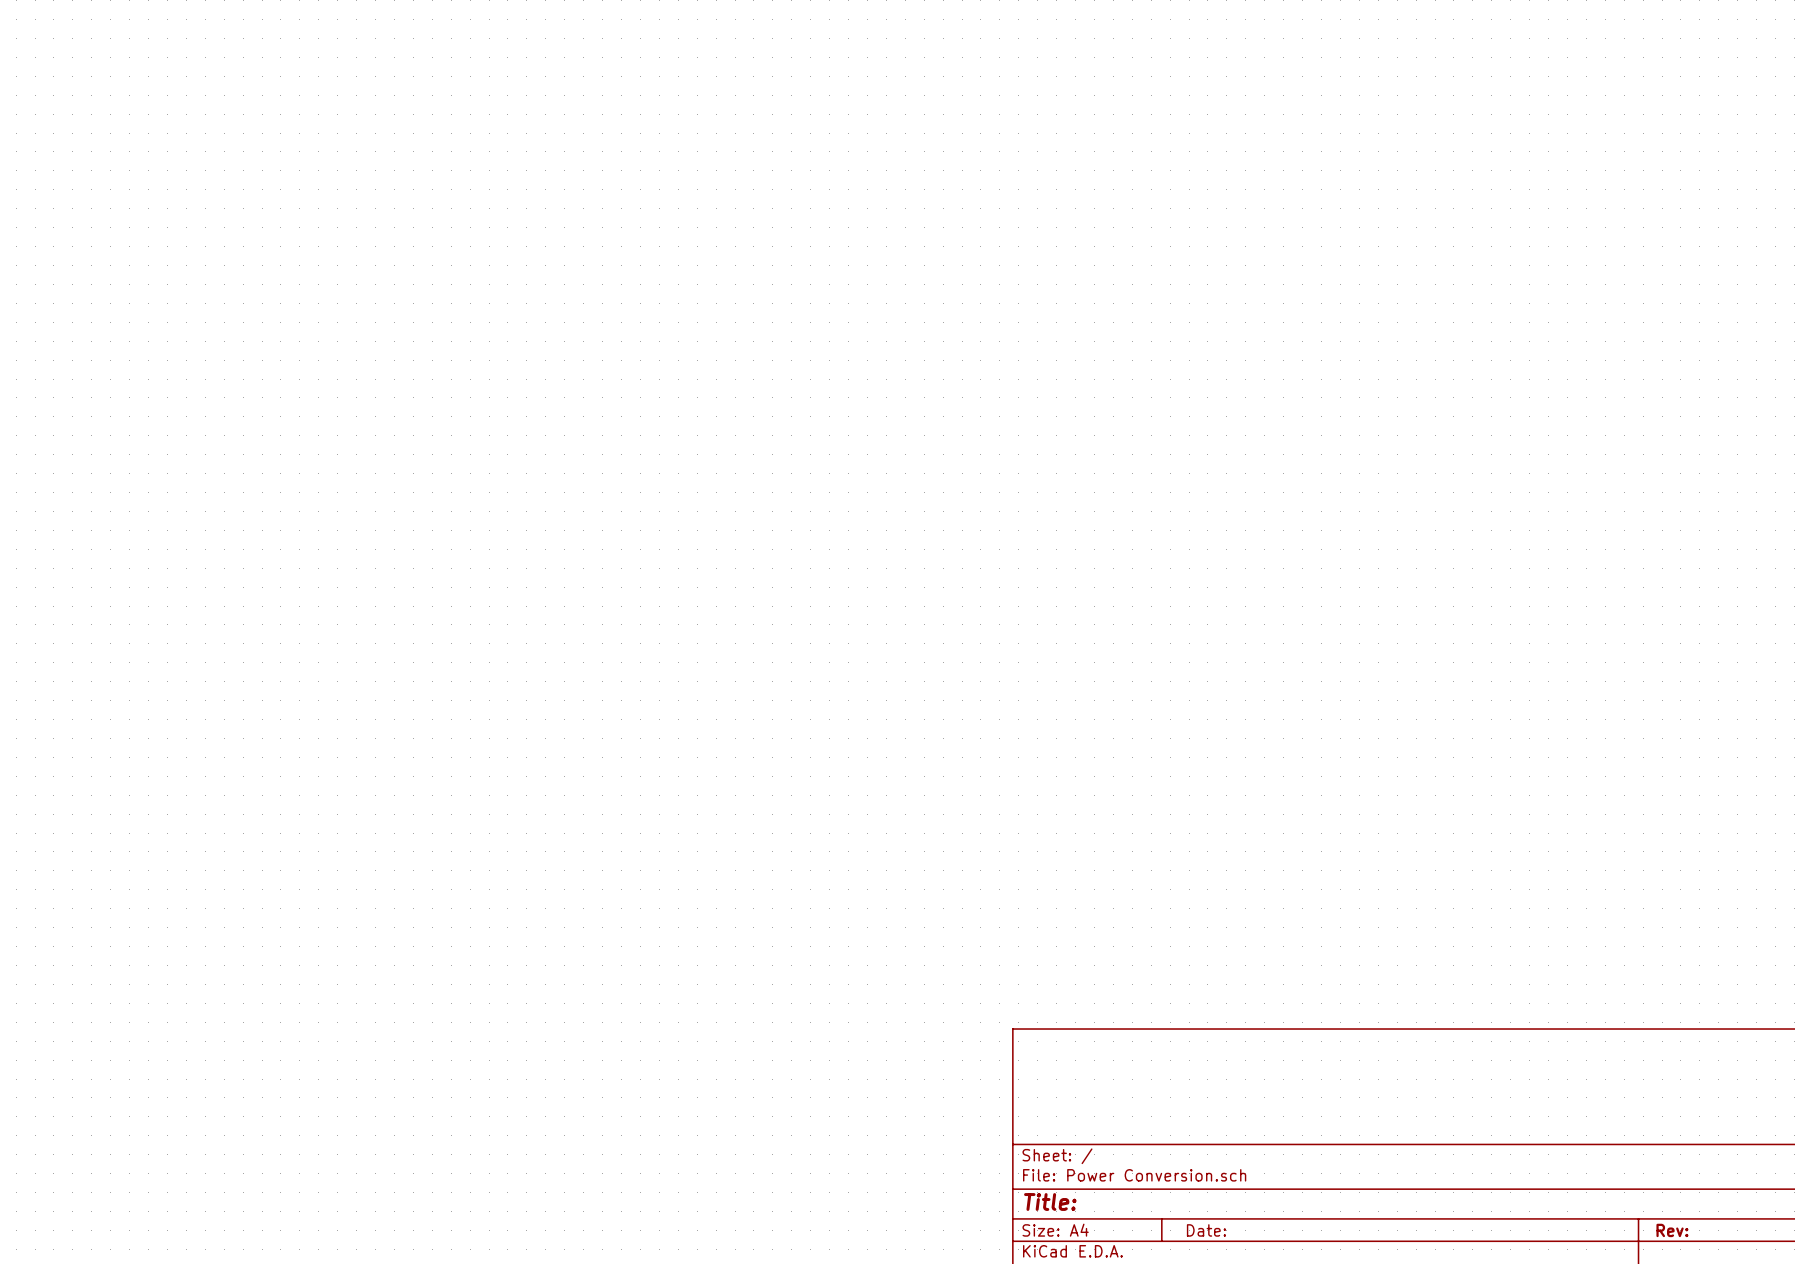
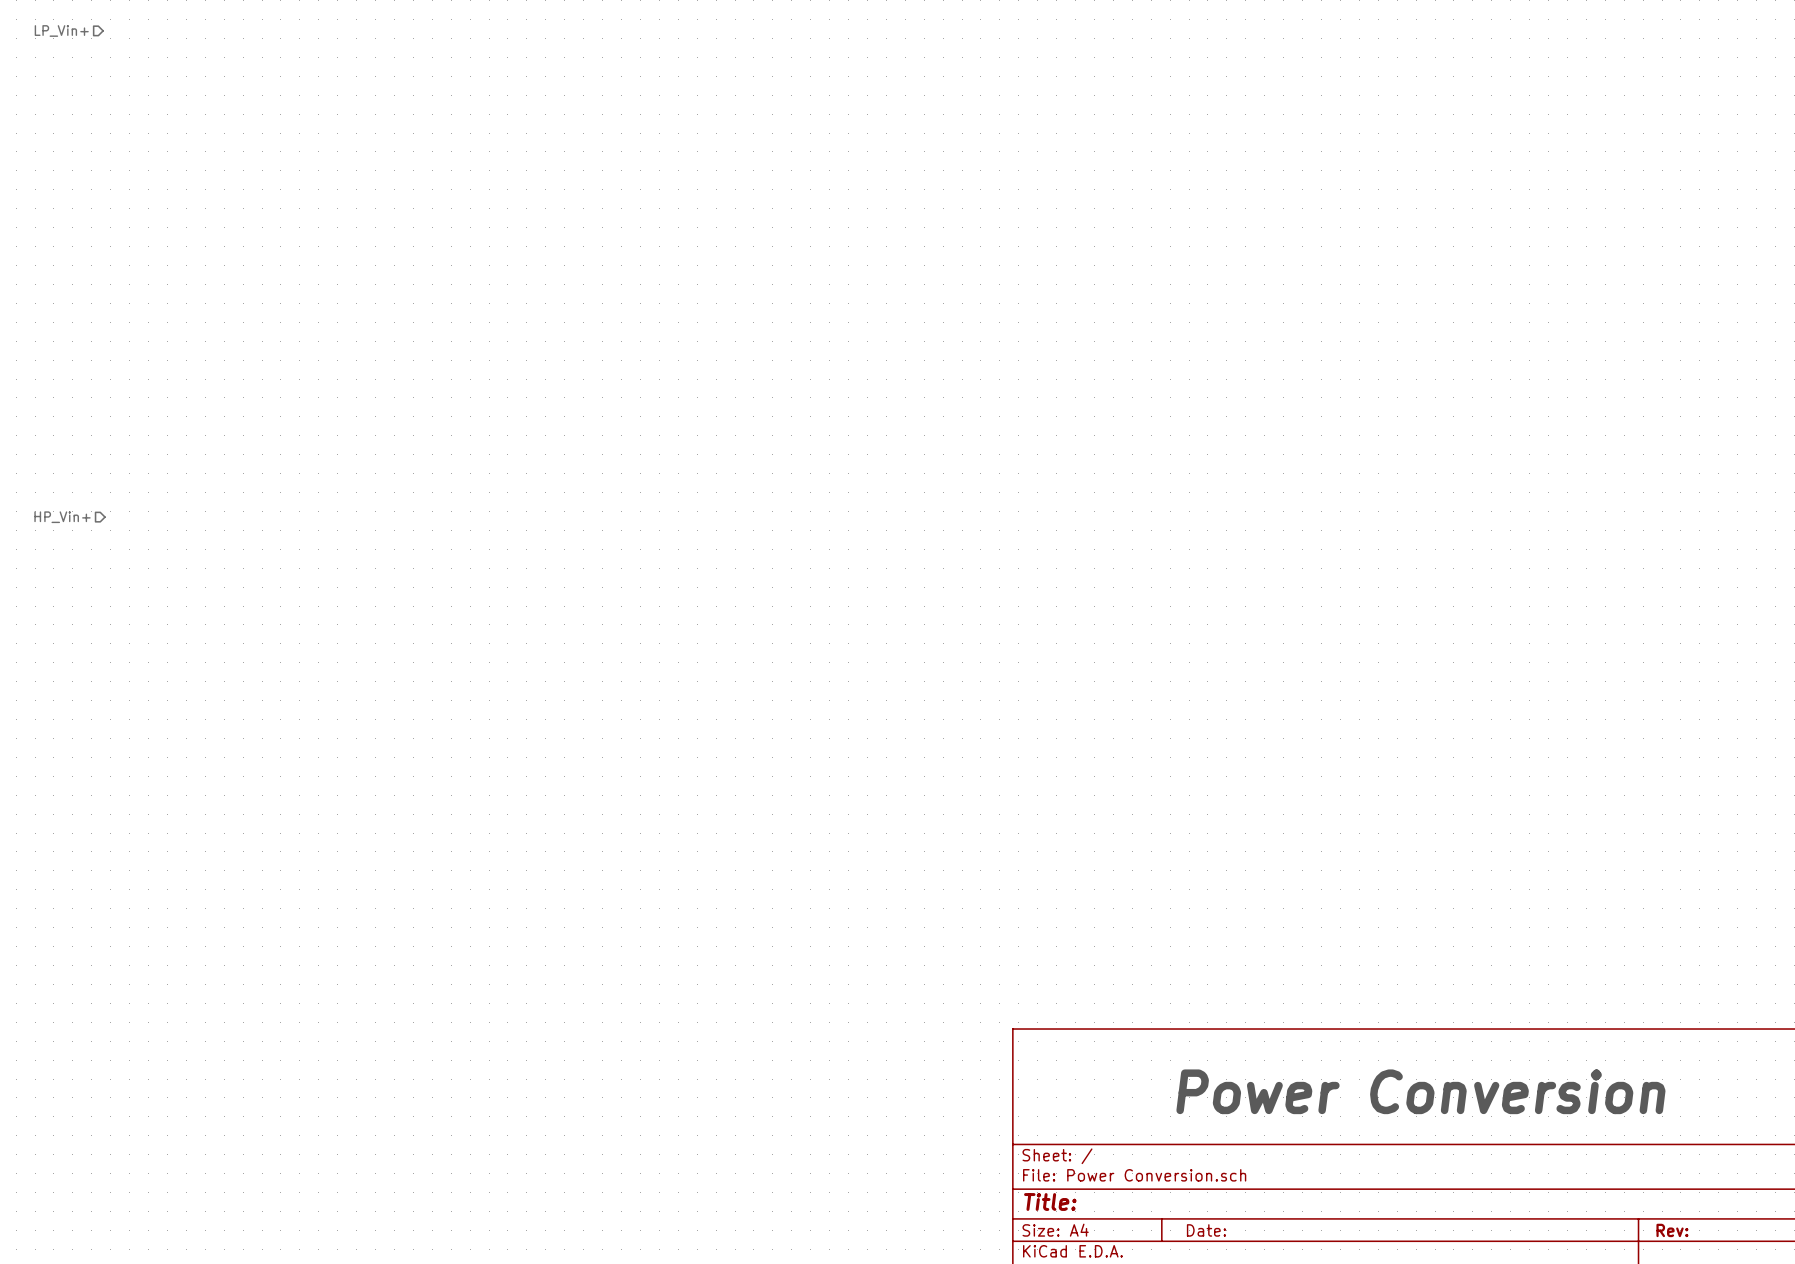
hierarchical label: none -> LP_Vin+ (61, 30)
hierarchical label: none -> HP_Vin+ (62, 517)
text: none -> Power Conversion (1420, 1091)

